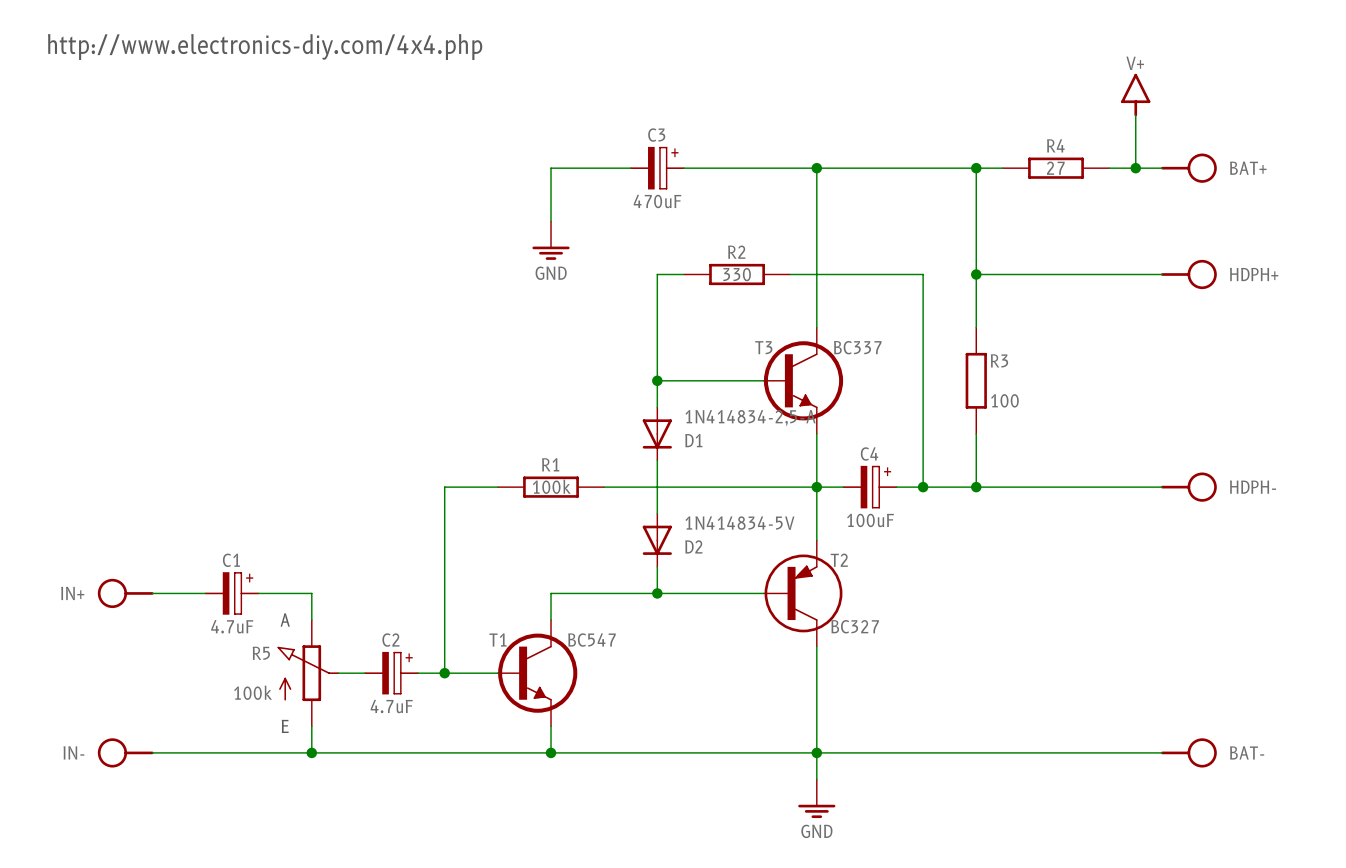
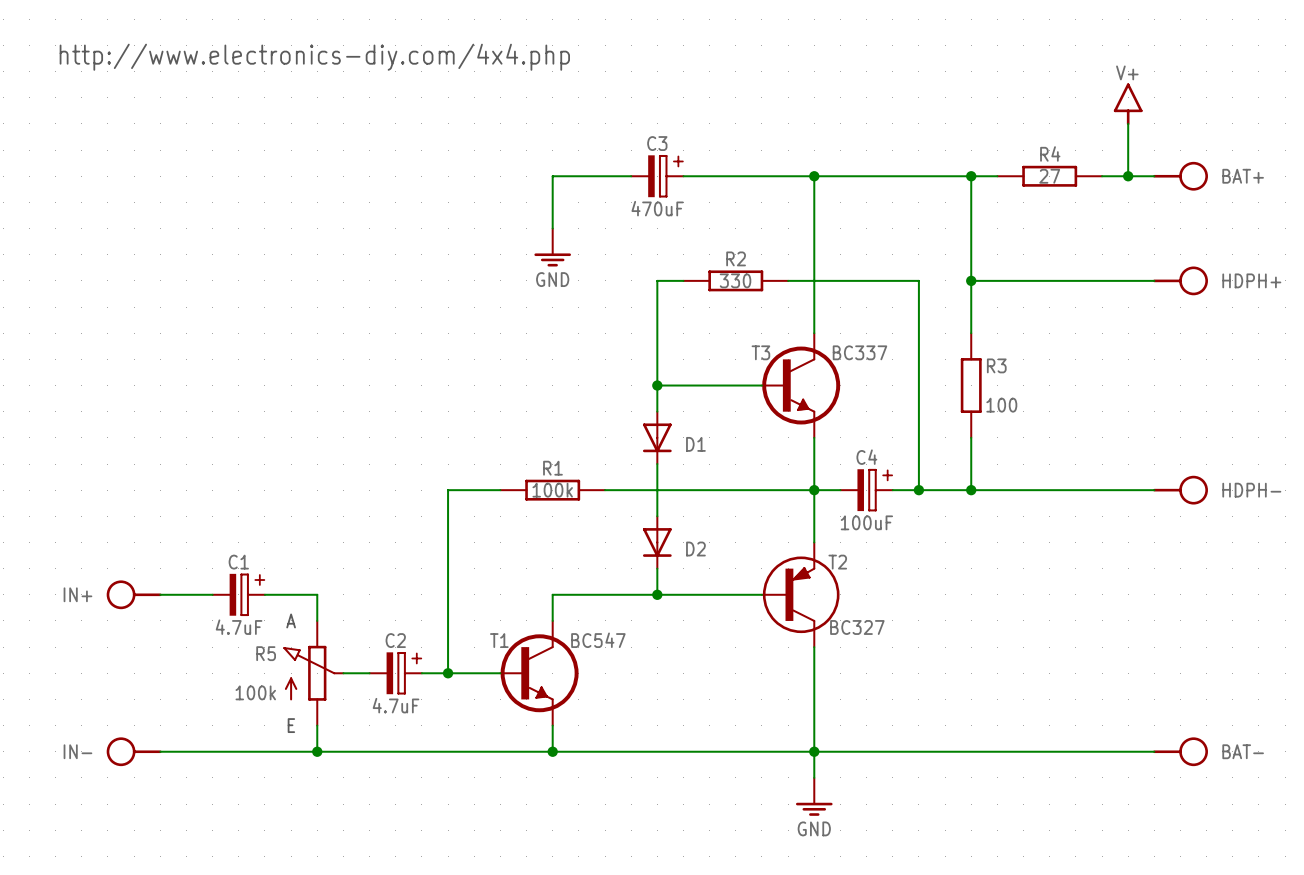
D1 value: 1N414834-2,5-A (750, 418) -> none
D2 value: 1N414834-5V (739, 523) -> none

